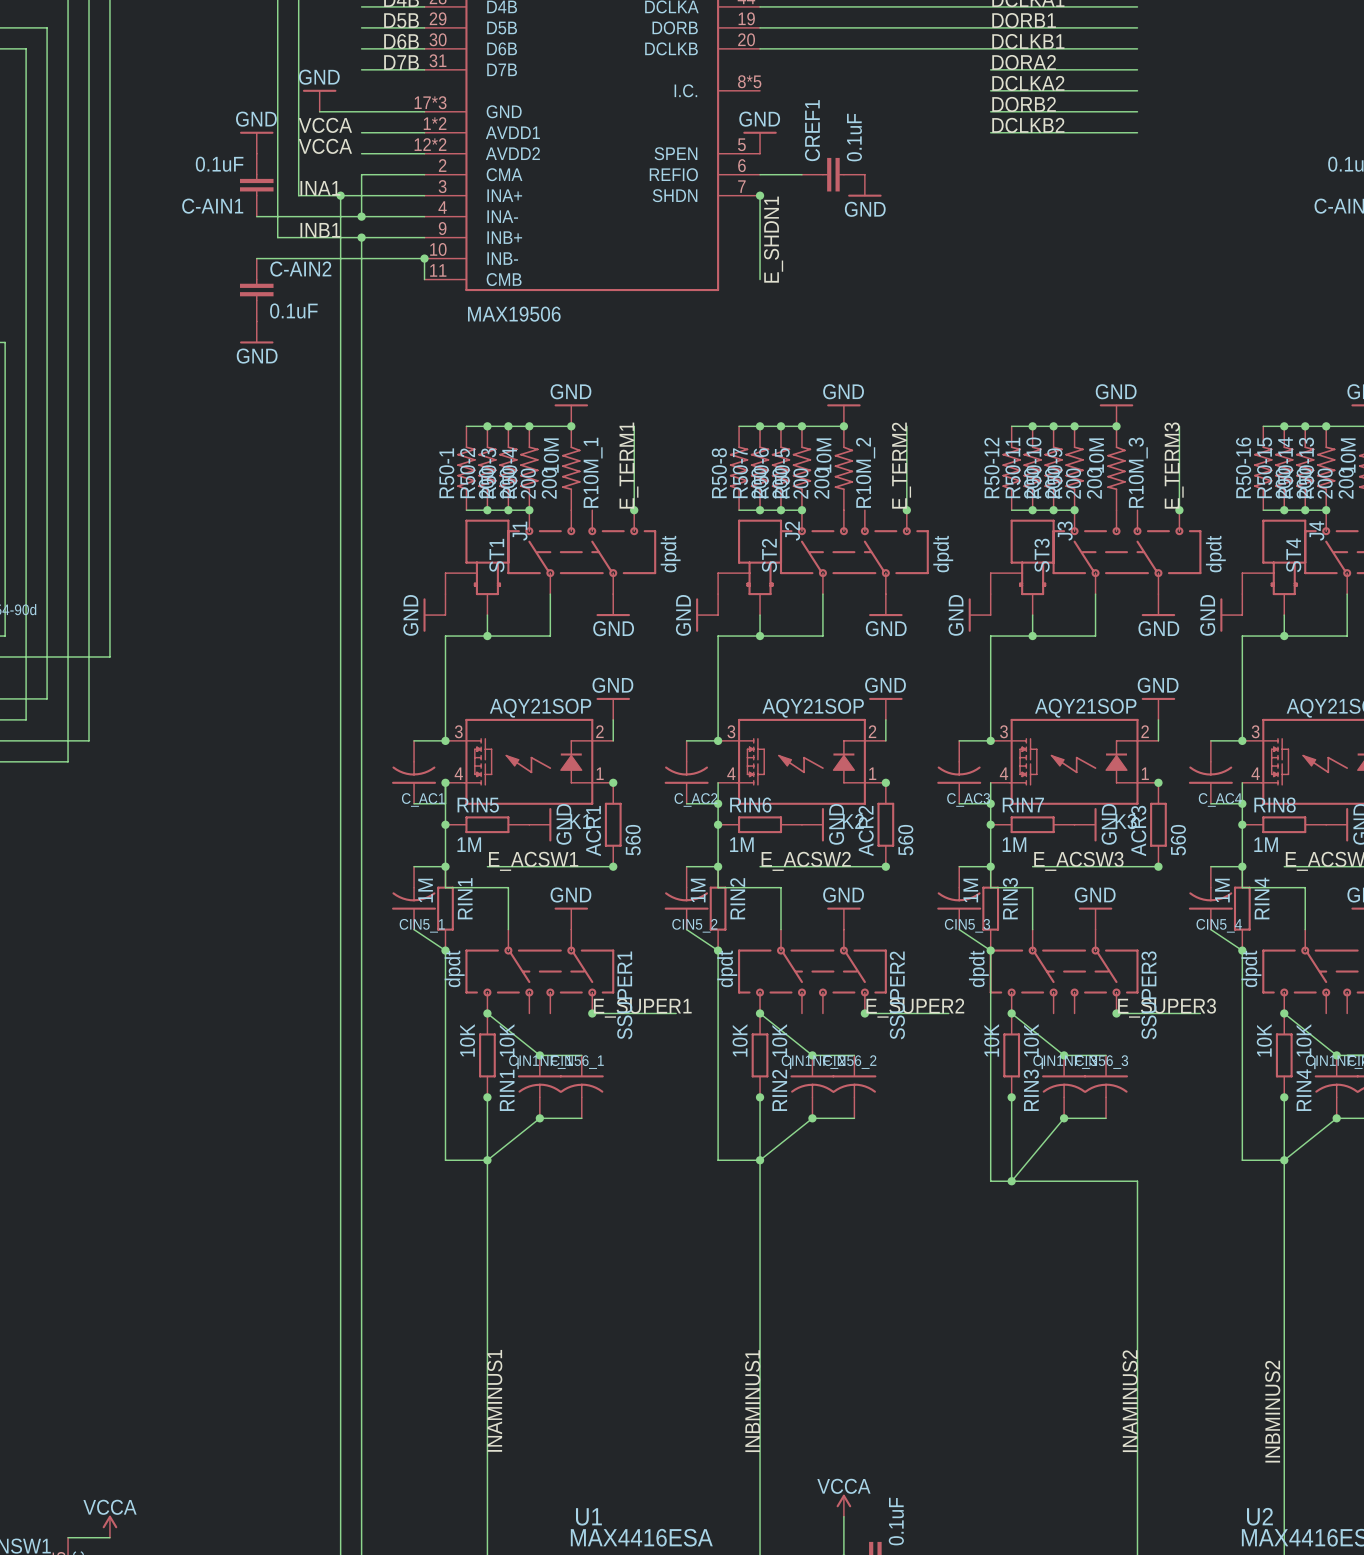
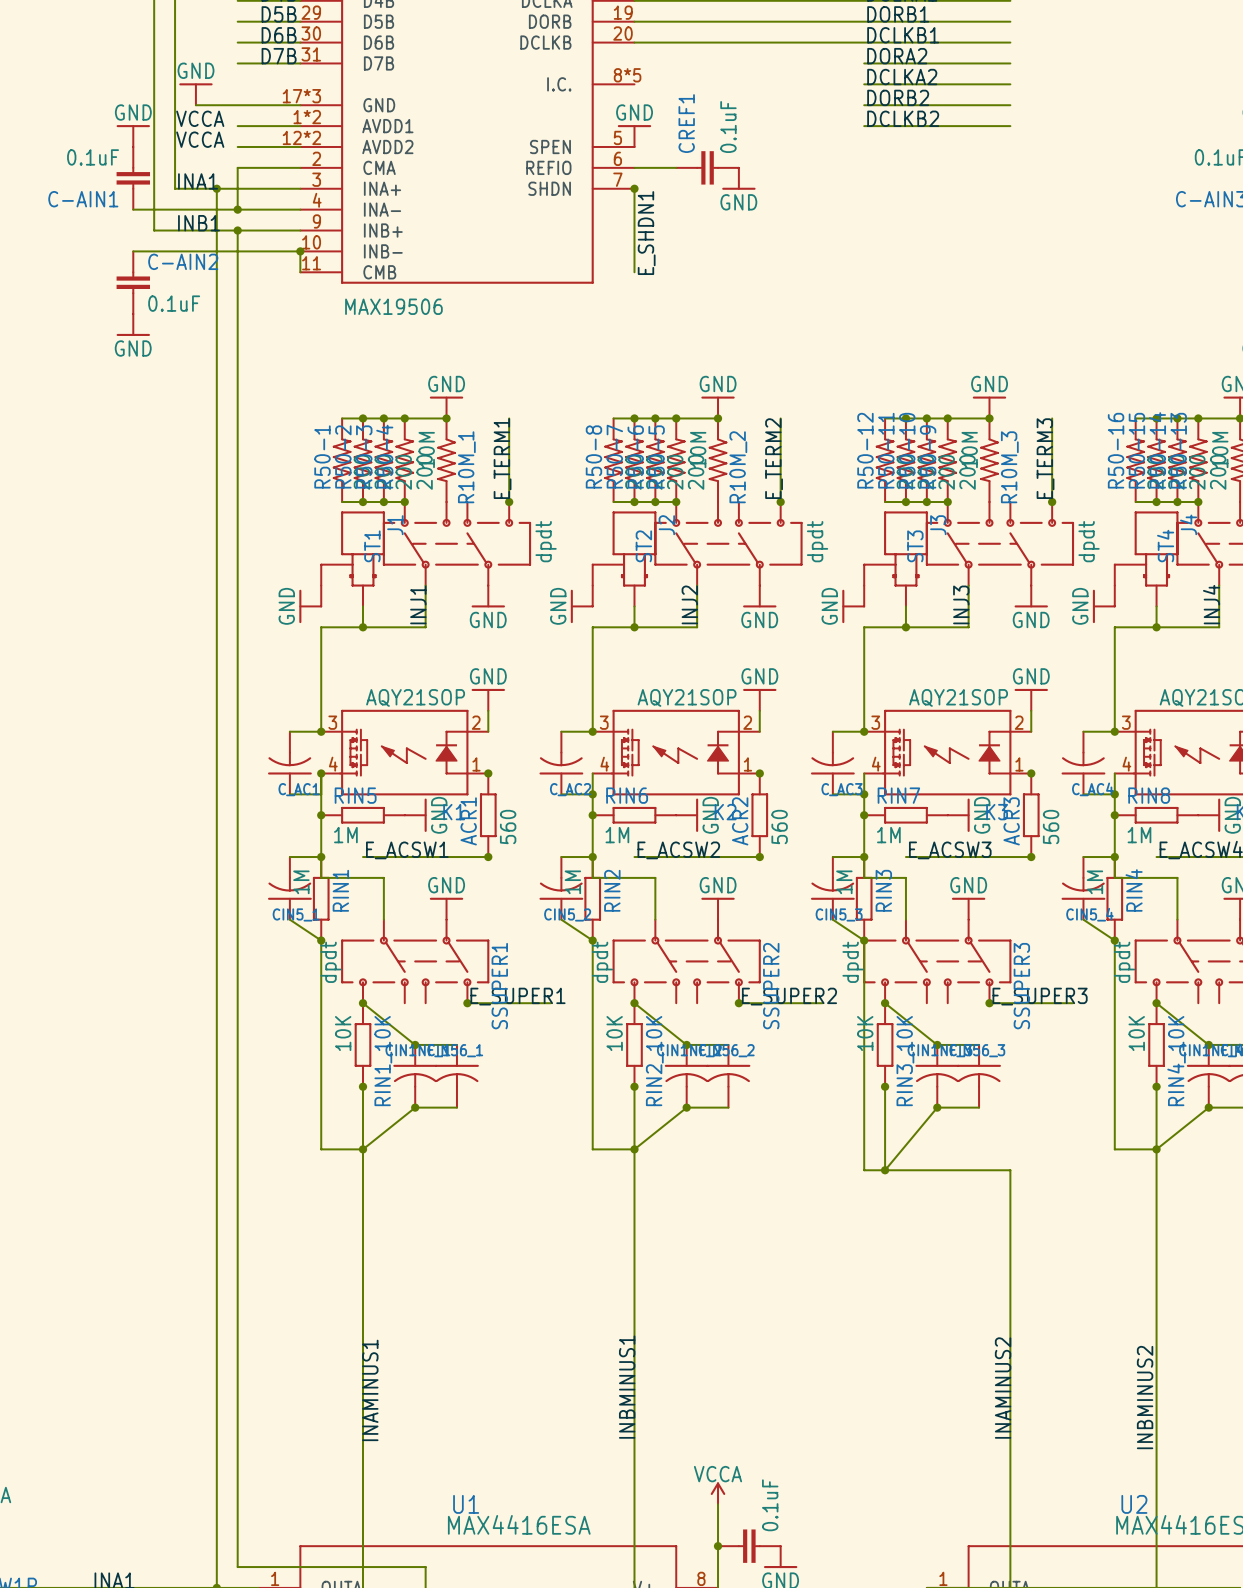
label: none -> INJ1 (418, 604)
label: none -> INJ2 (689, 604)
label: none -> INJ3 (961, 604)
label: none -> INJ4 (1211, 604)

